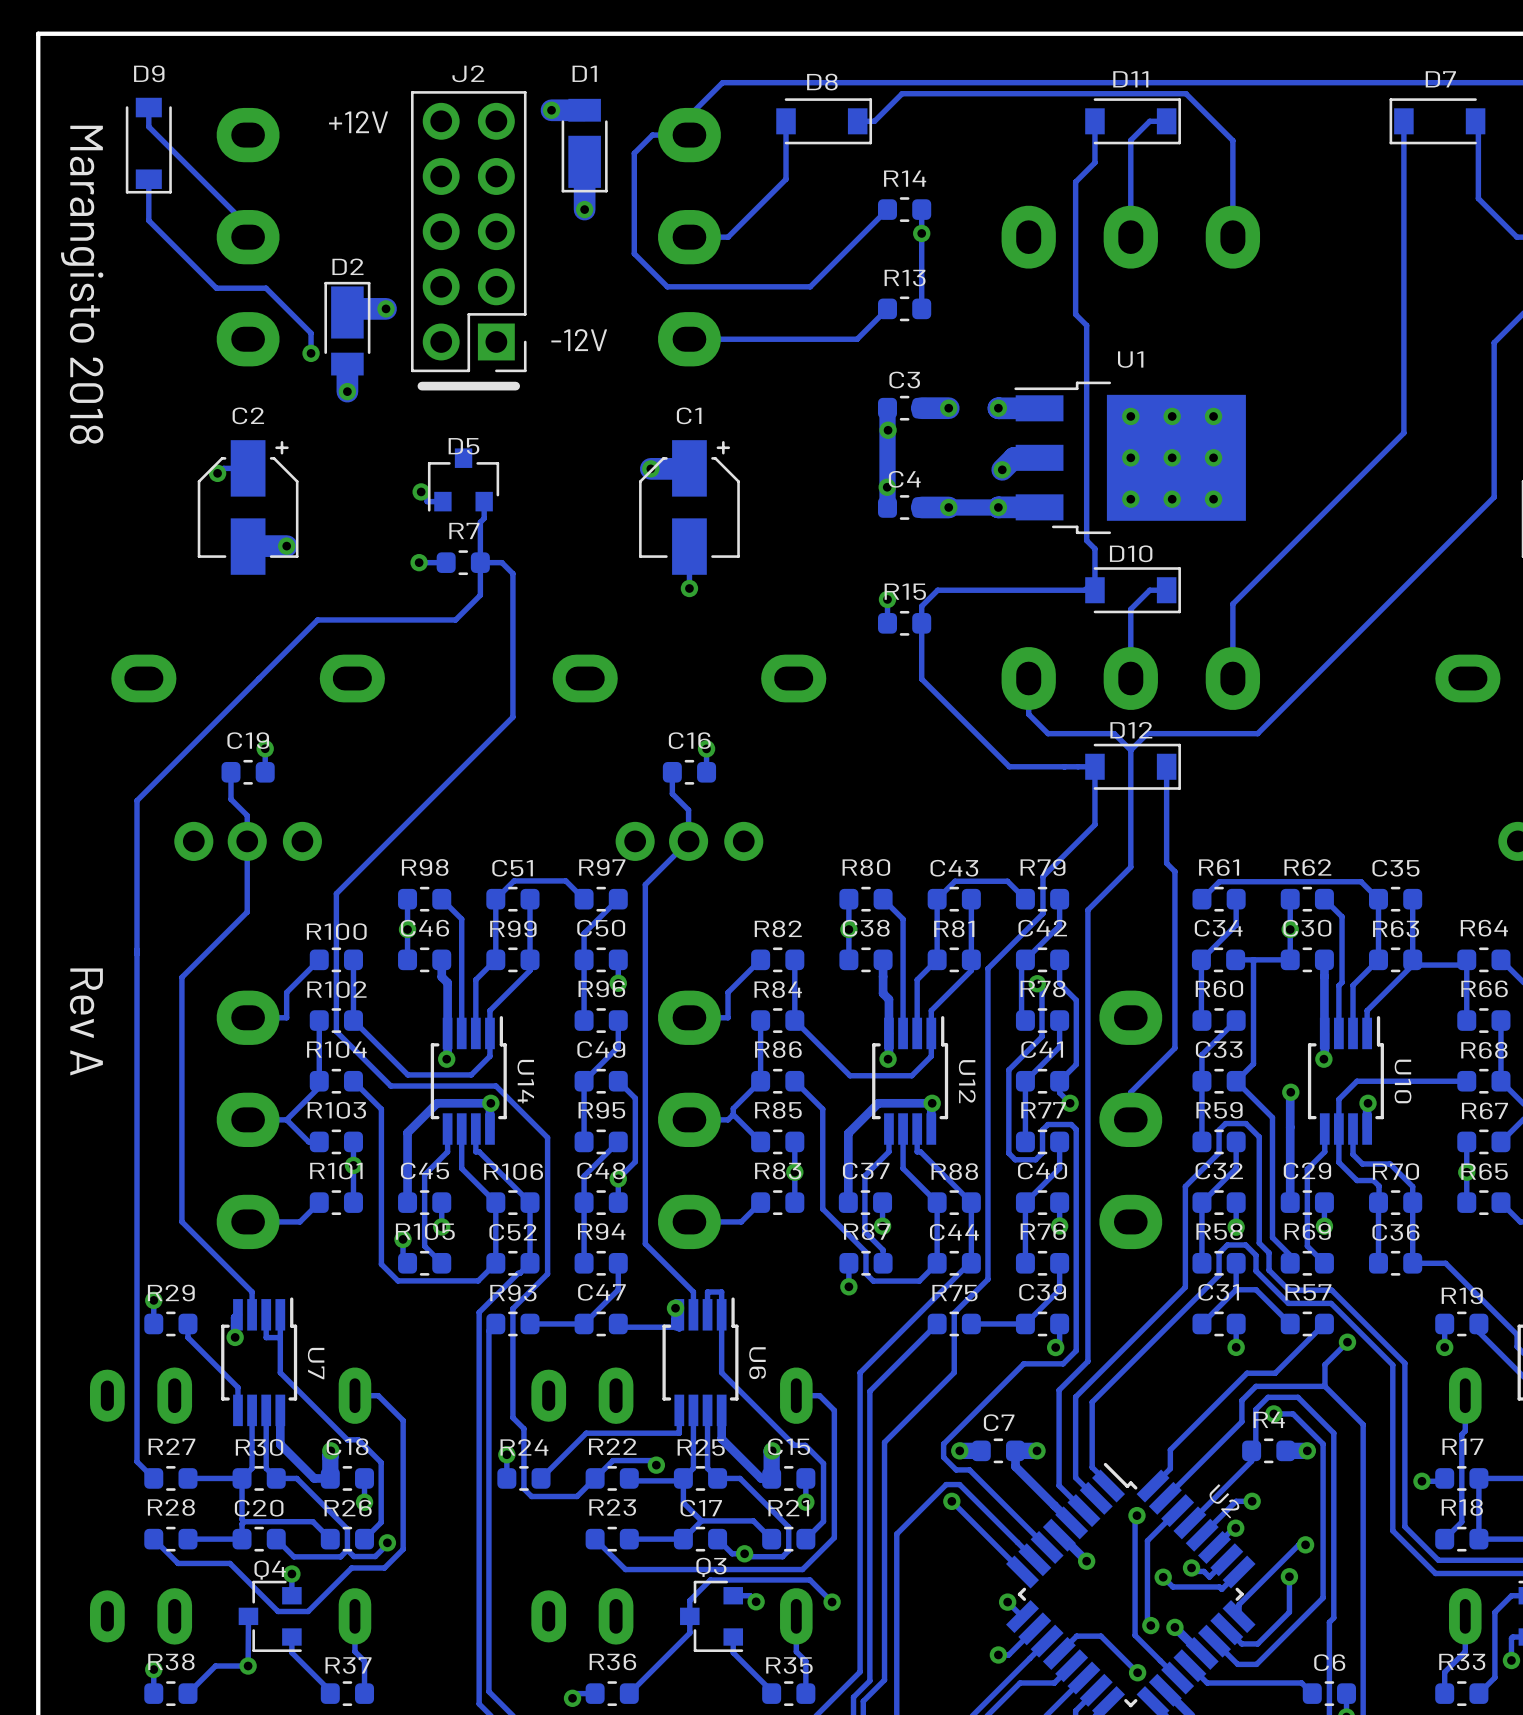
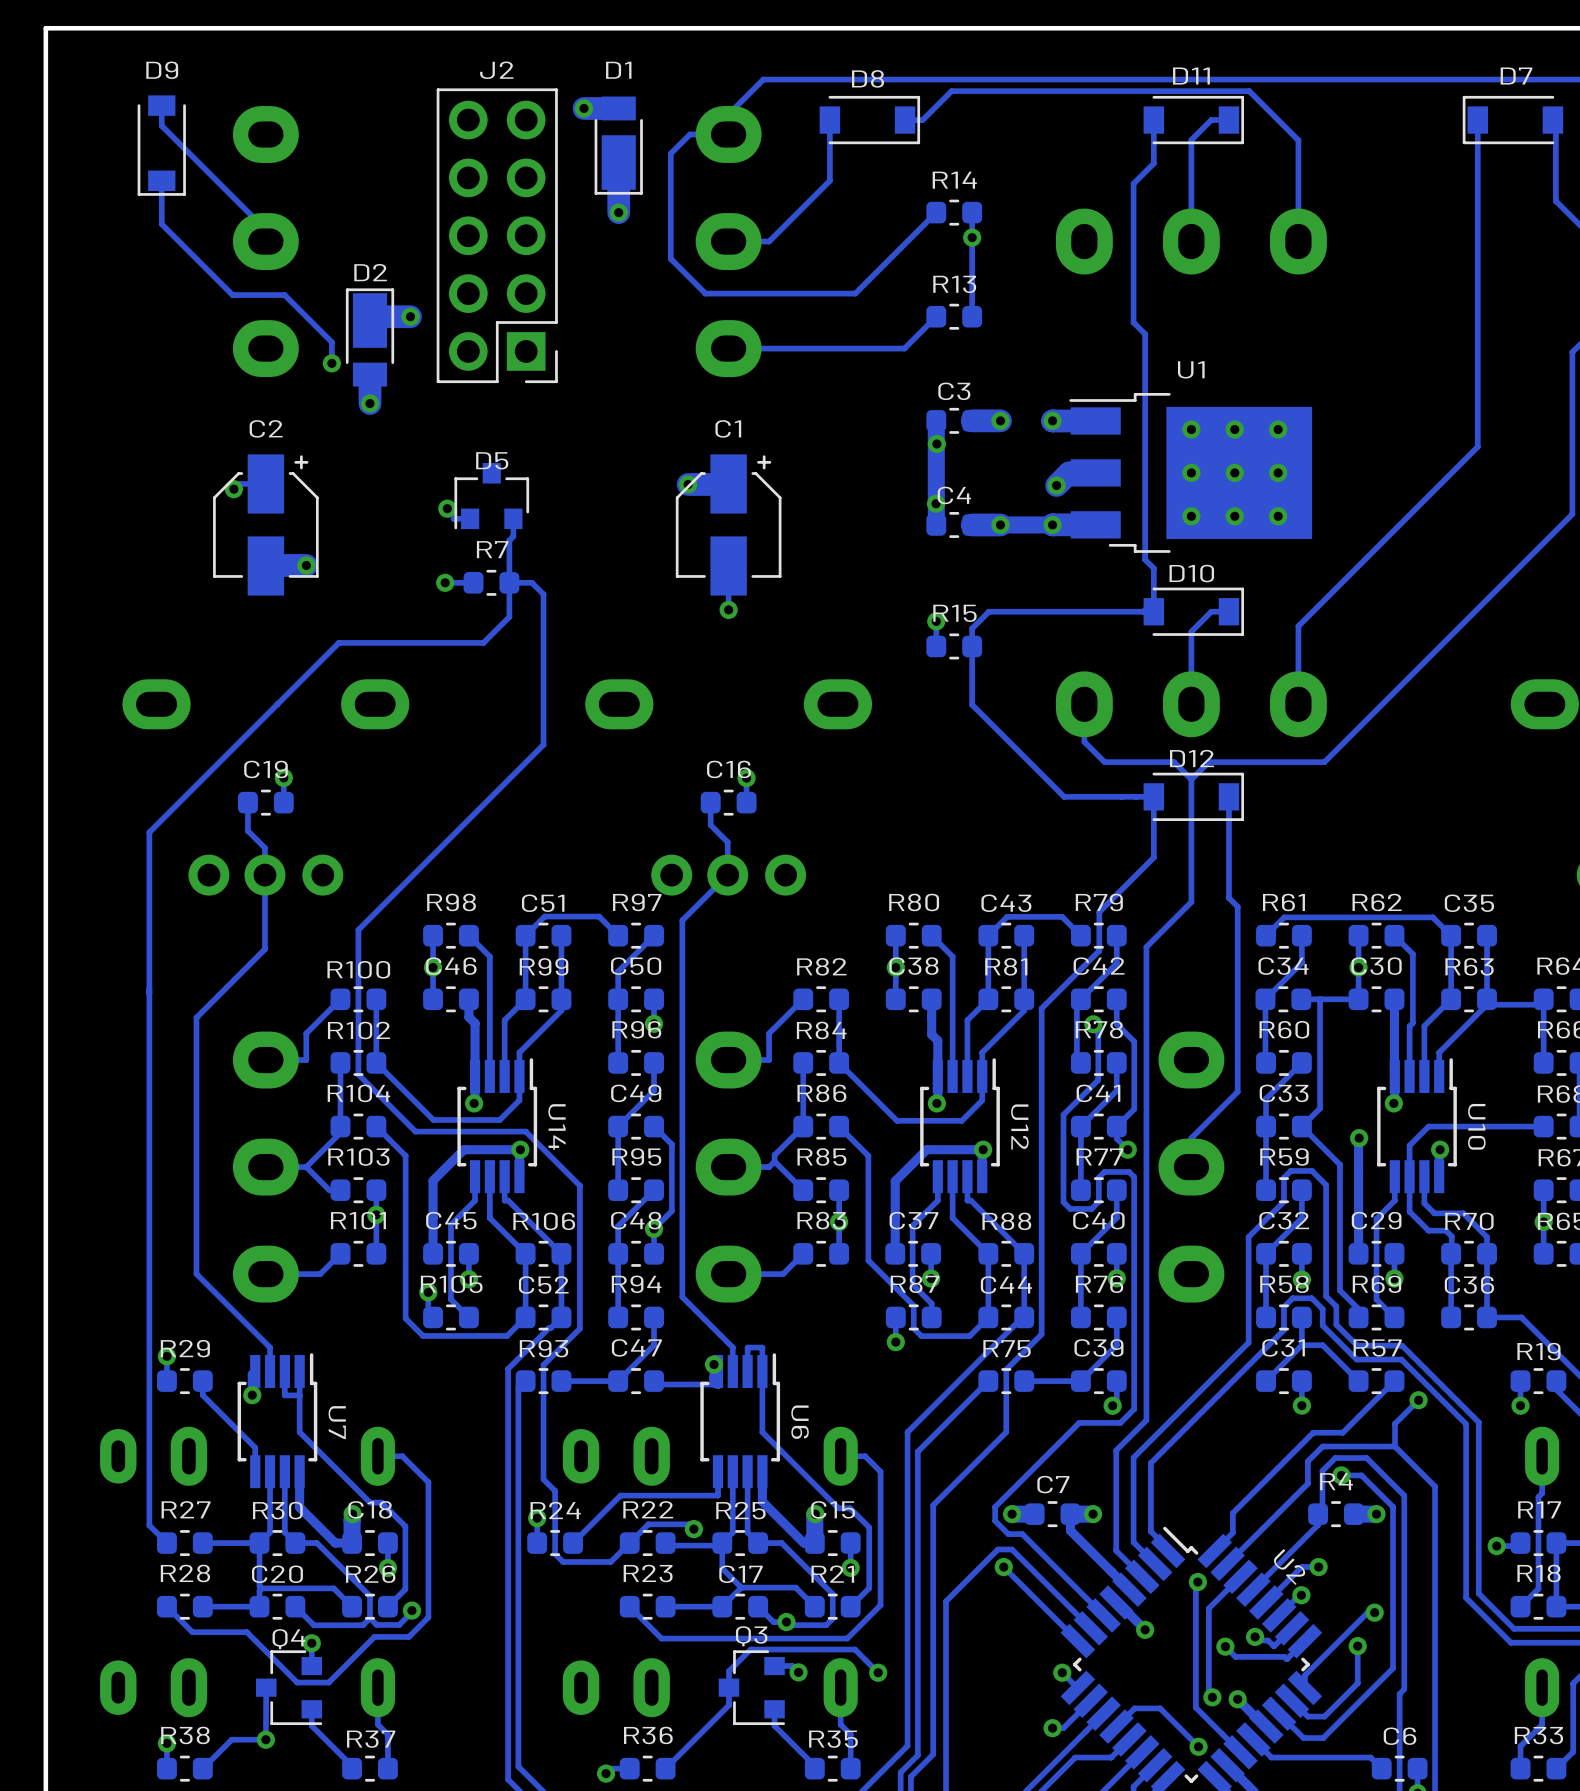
text: +12V (358, 122) -> none
text: Marangisto 2018 (82, 284) -> none
text: -12V (579, 340) -> none
line: (515, 386) (421, 386) -> none
text: Rev A (86, 1021) -> none

